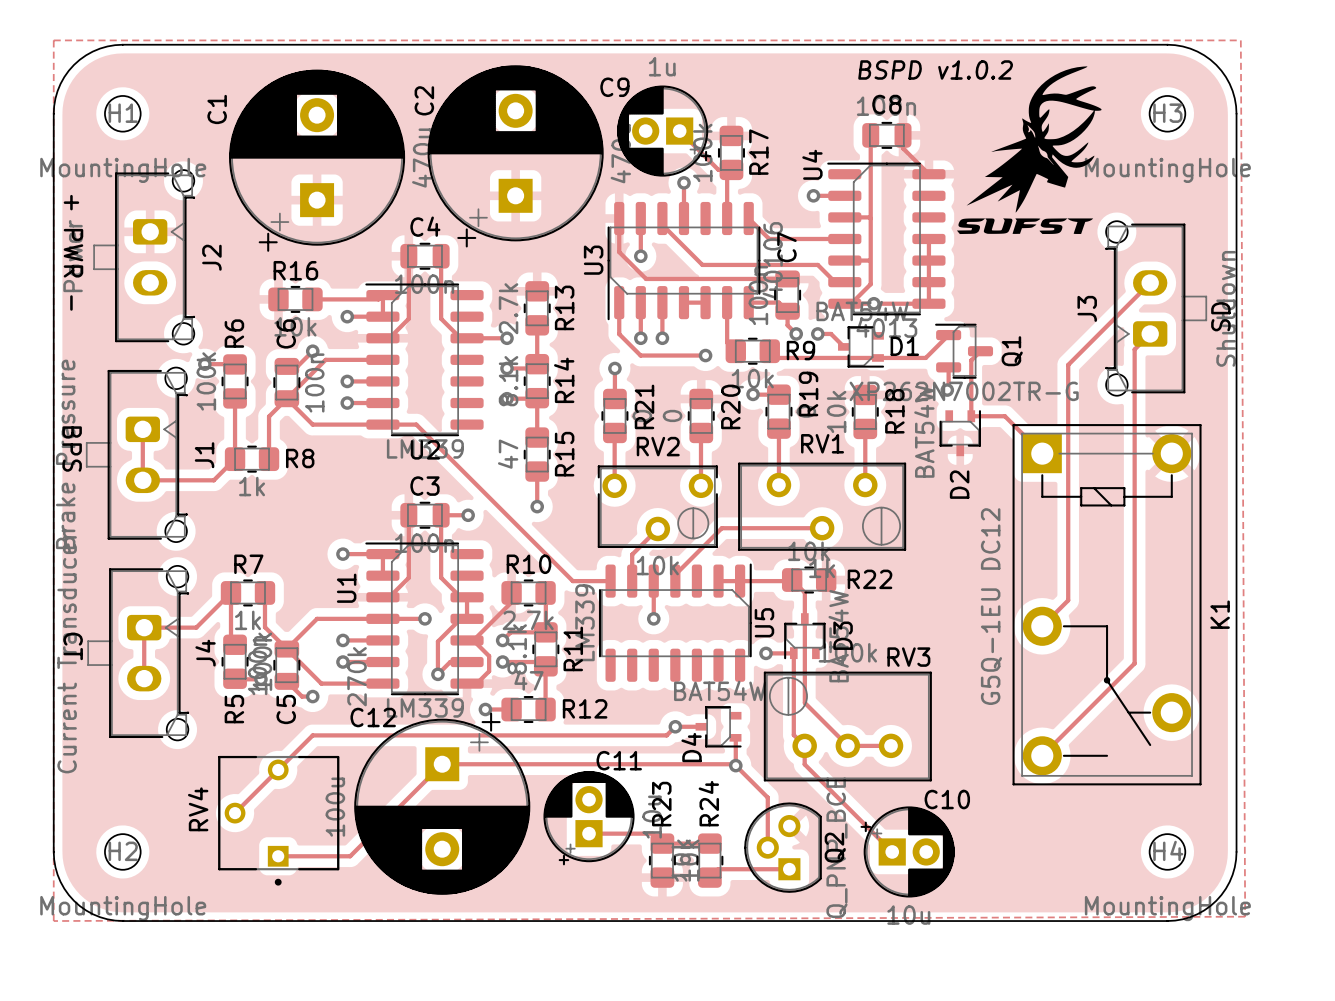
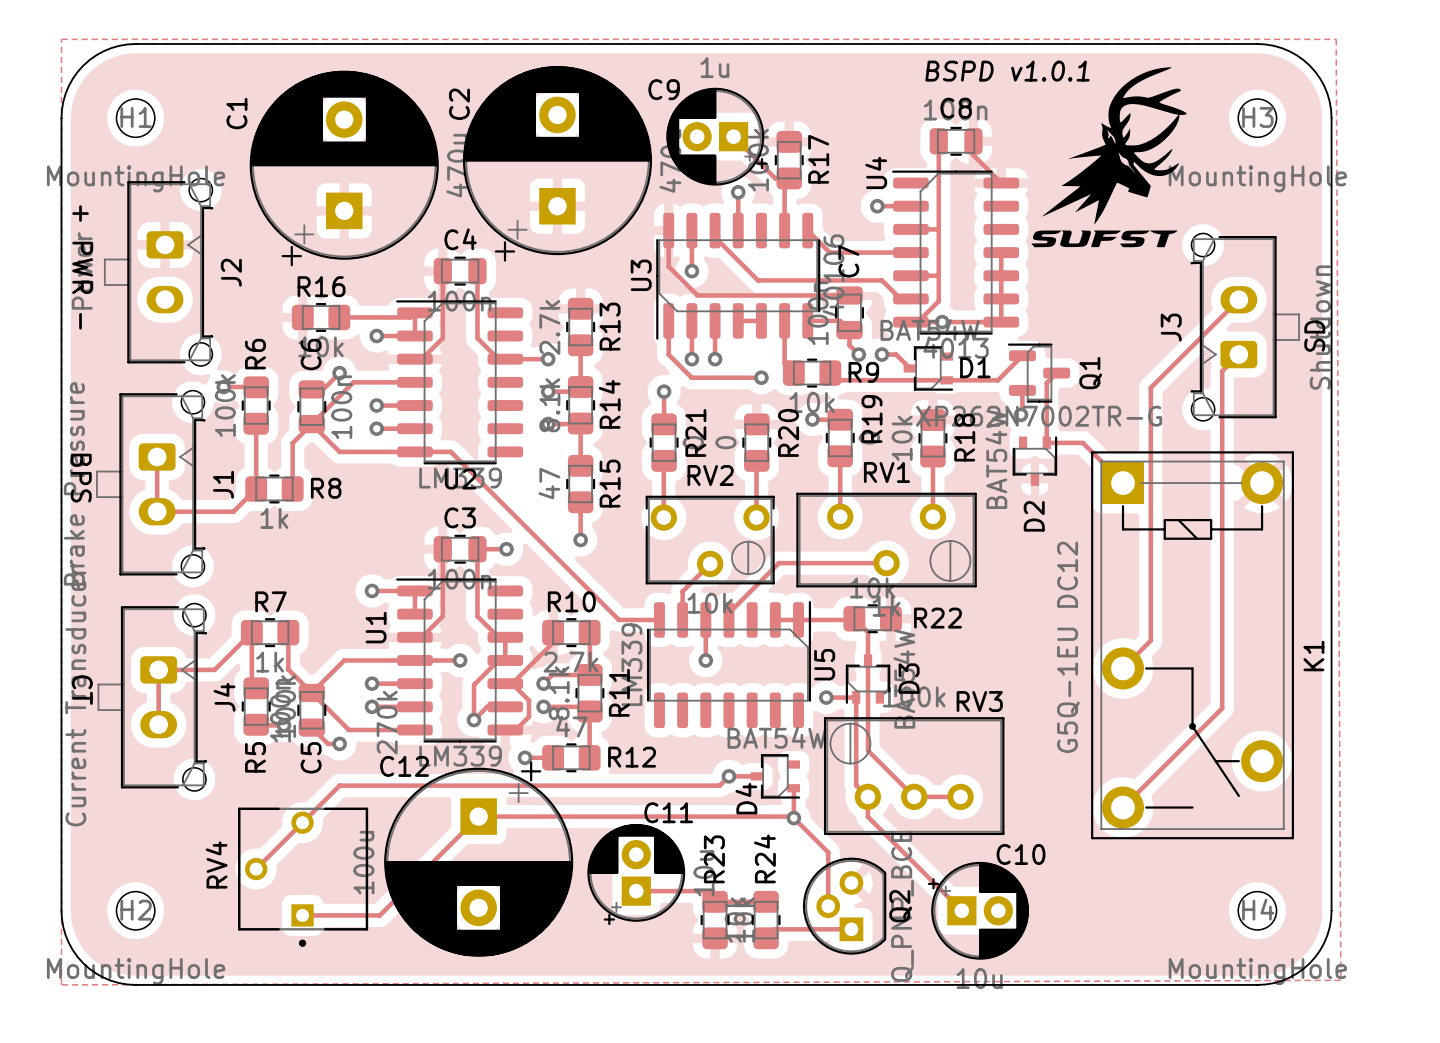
text: BSPD v1.0.2 (935, 69) -> BSPD v1.0.1 (1007, 71)

